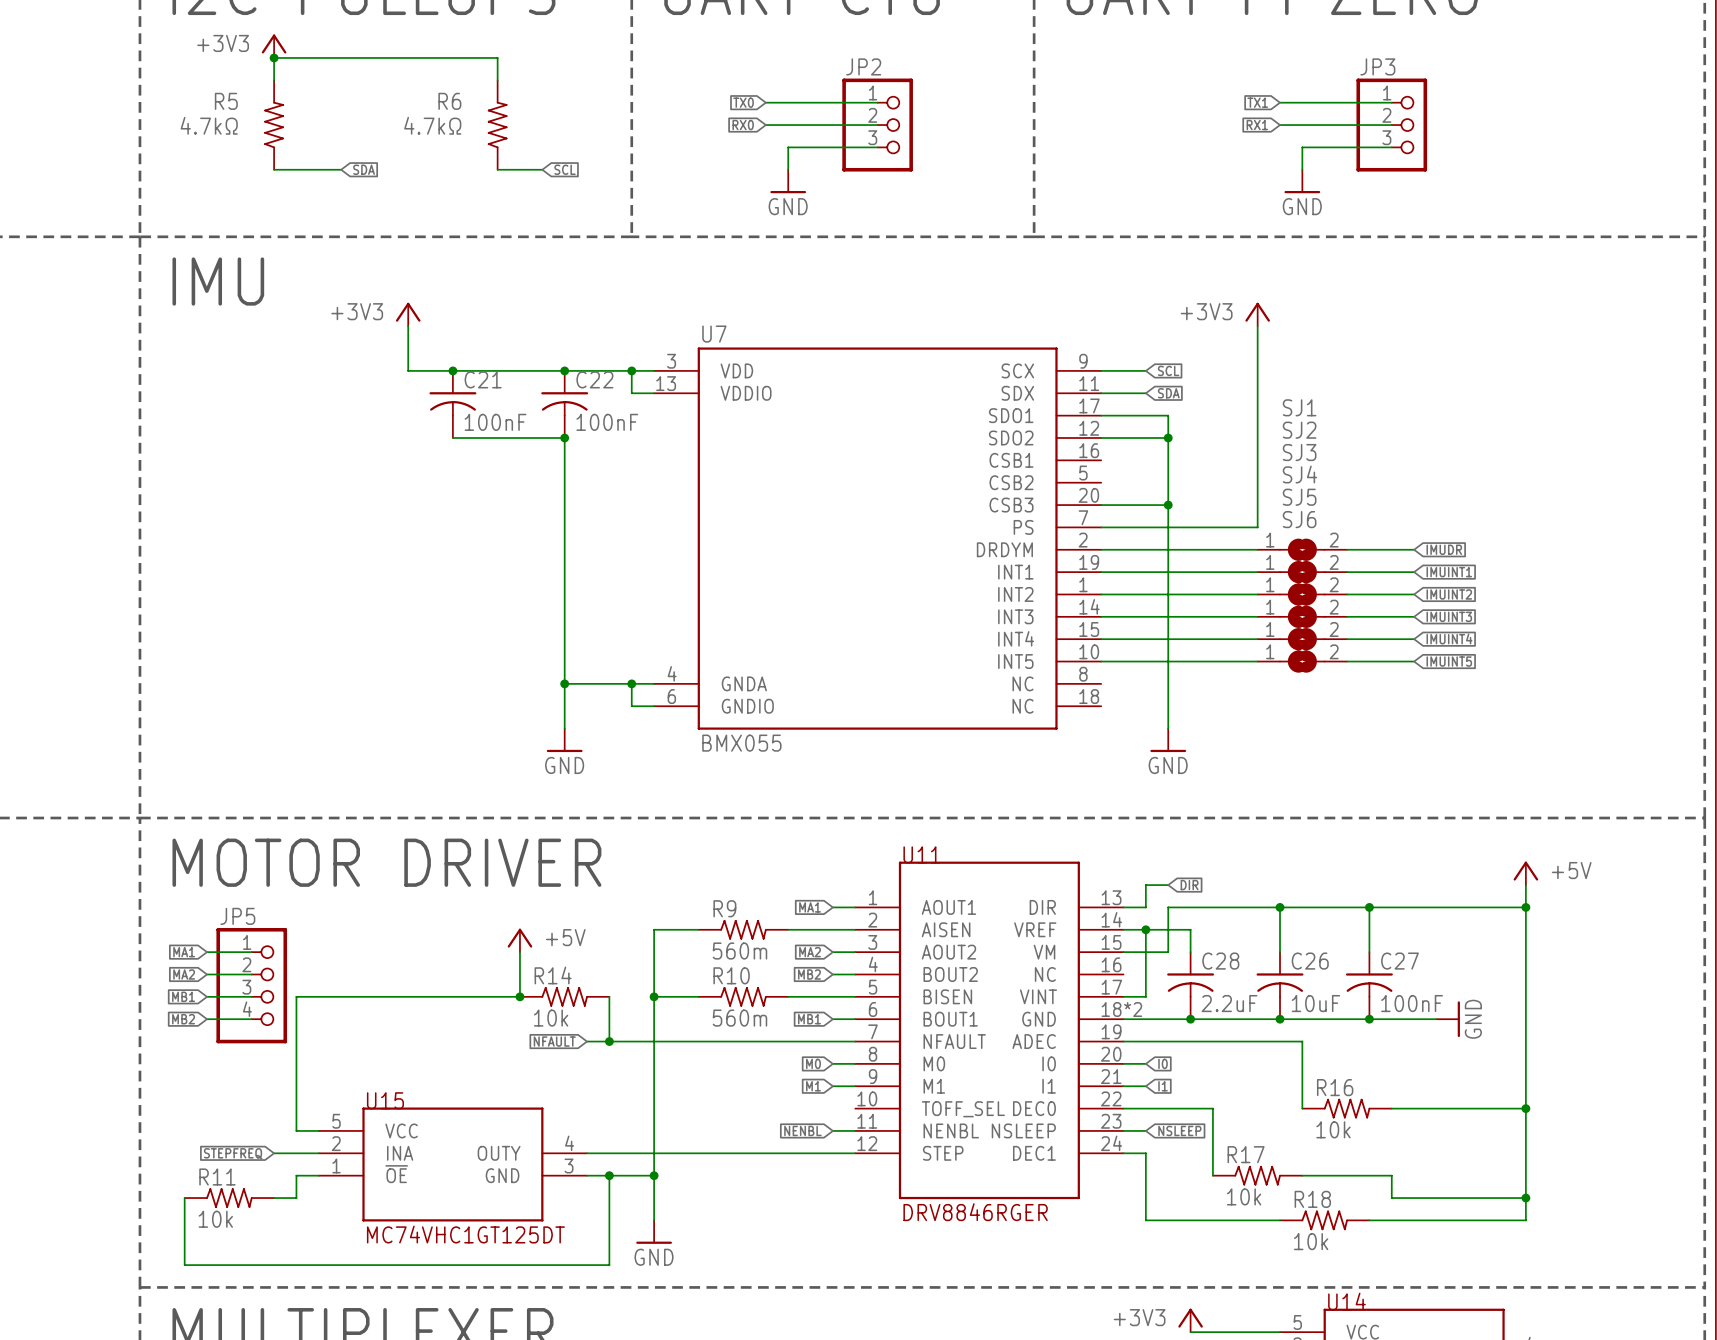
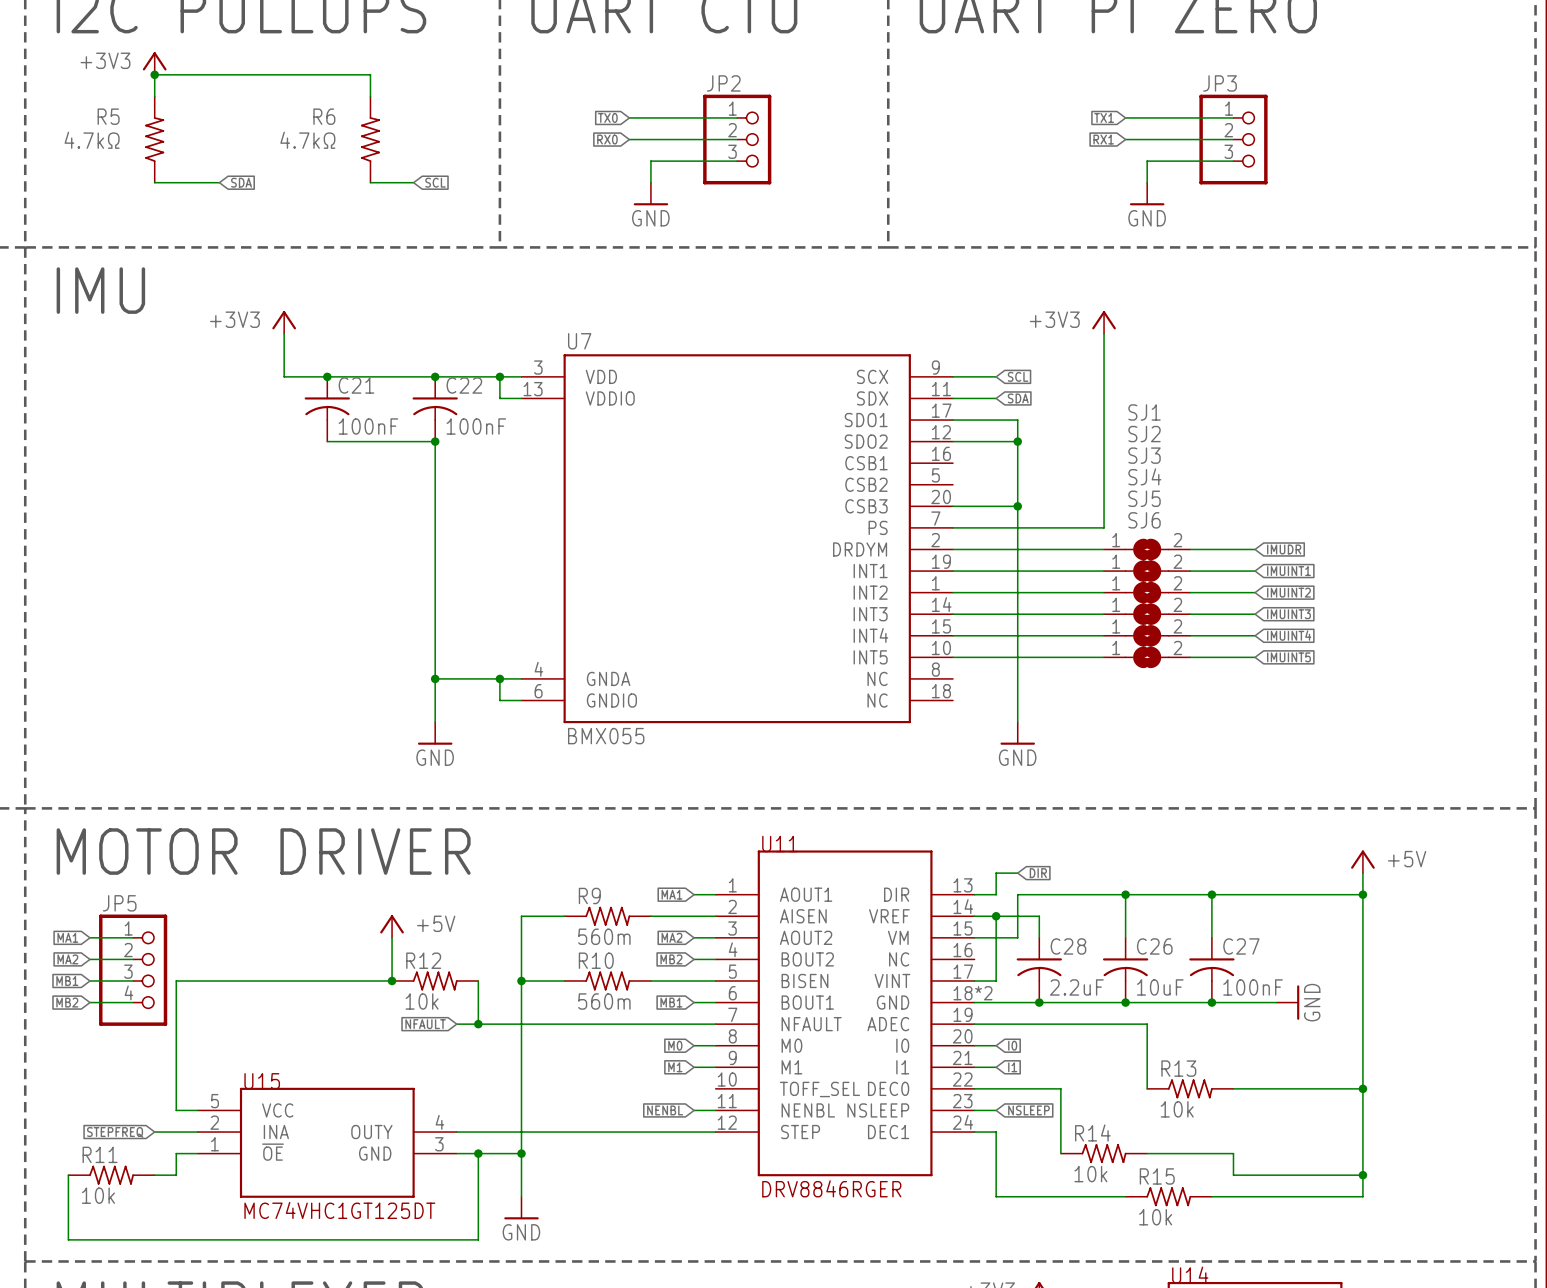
R14 name: R14 (553, 975) -> R12 (423, 960)
R16 name: R16 (1335, 1087) -> R13 (1178, 1068)
R17 name: R17 (1246, 1154) -> R14 (1092, 1132)
R18 name: R18 (1312, 1199) -> R15 (1157, 1176)

